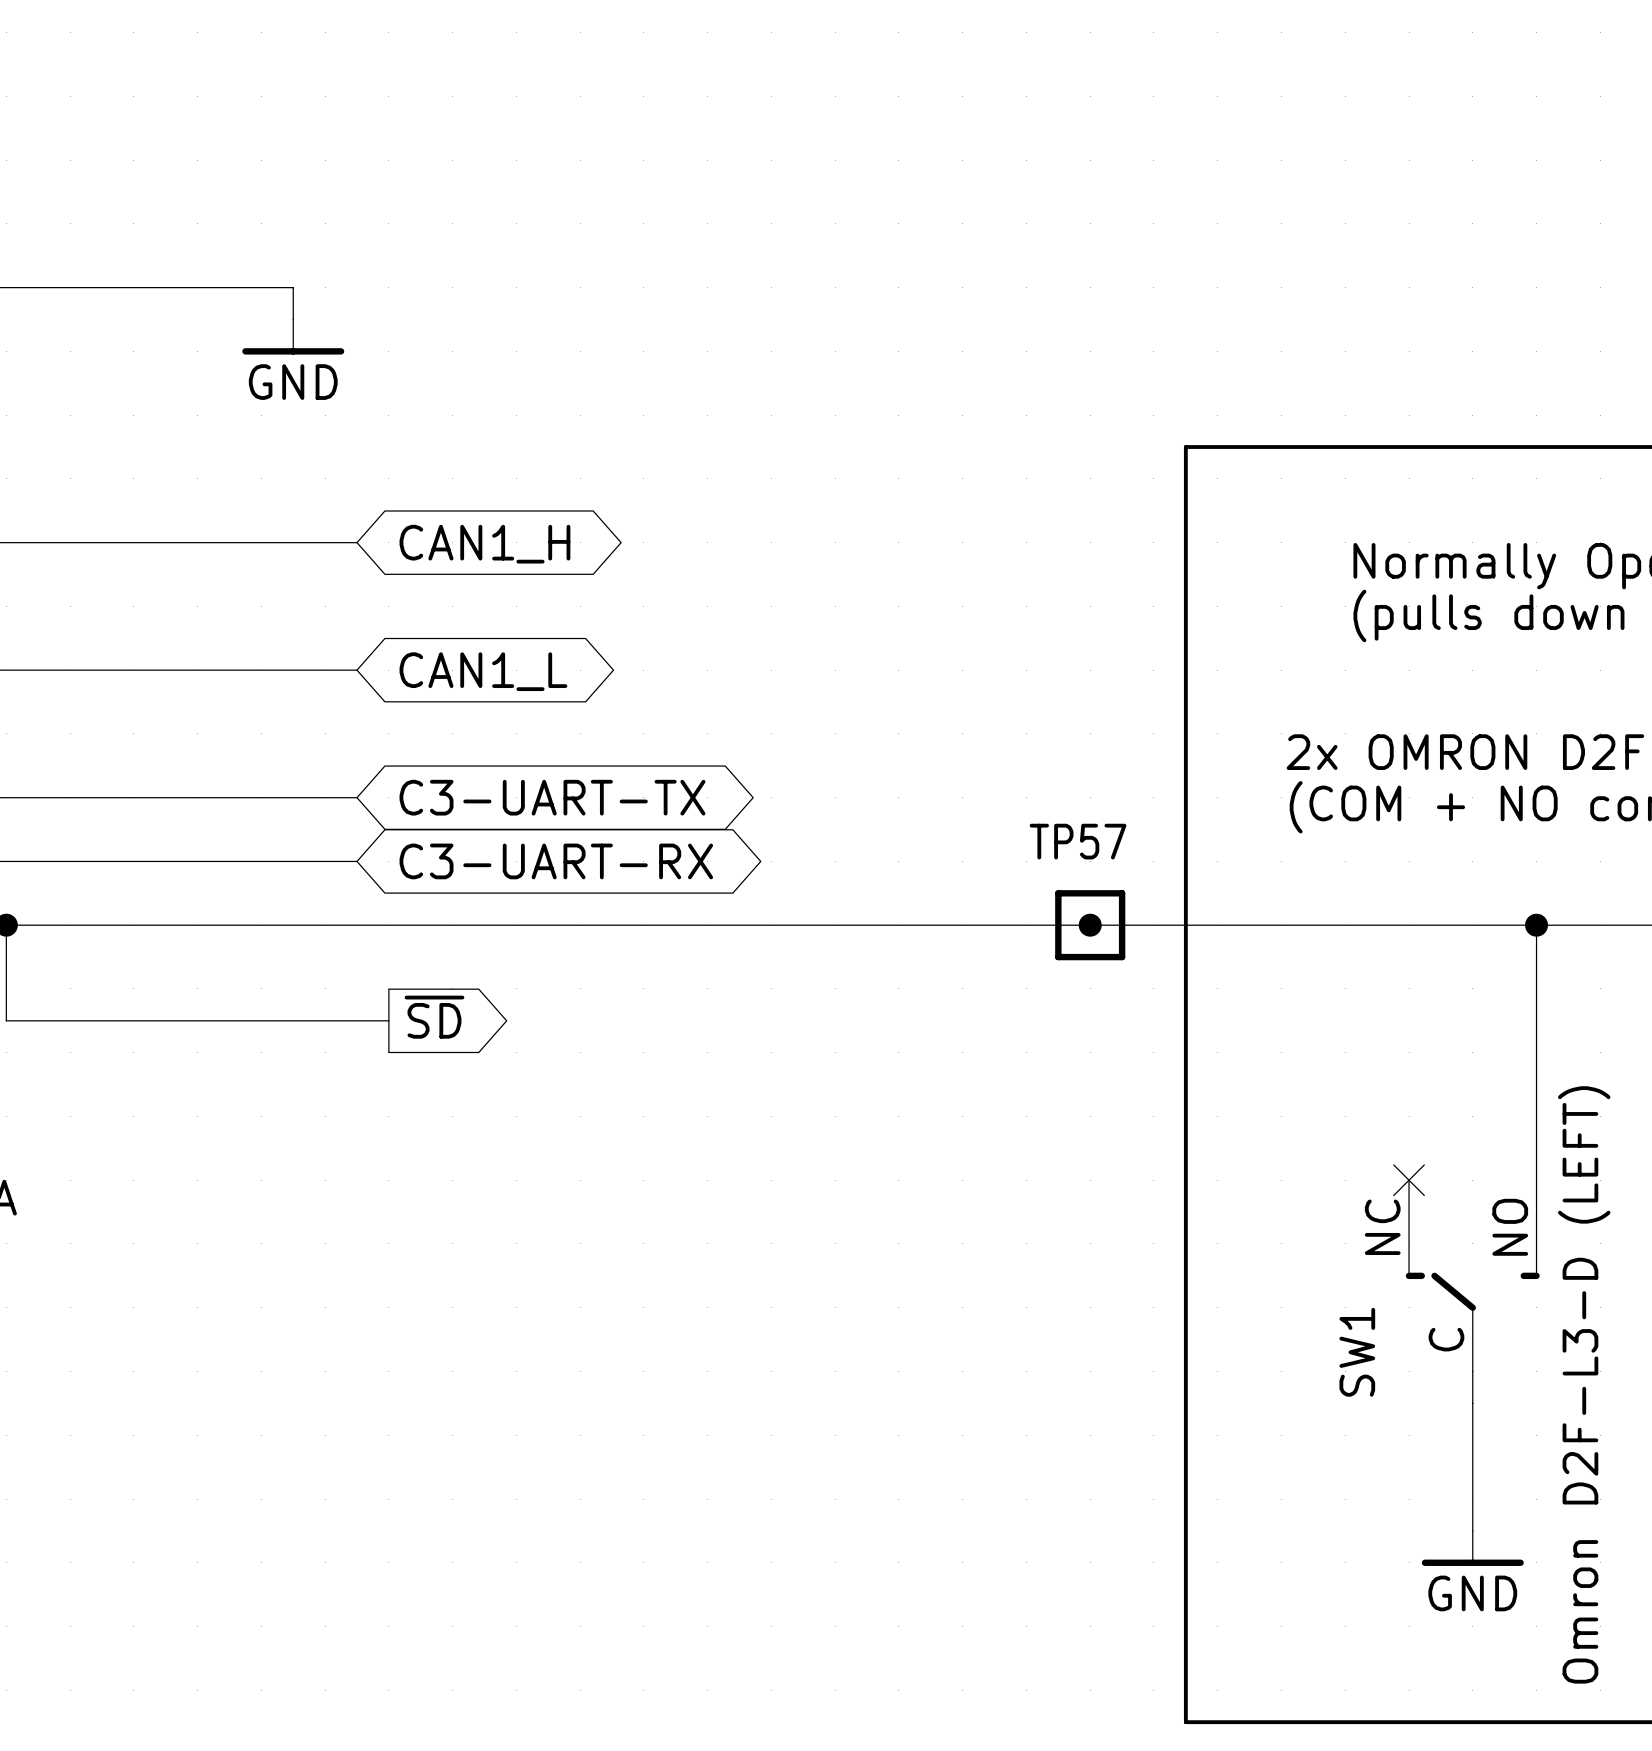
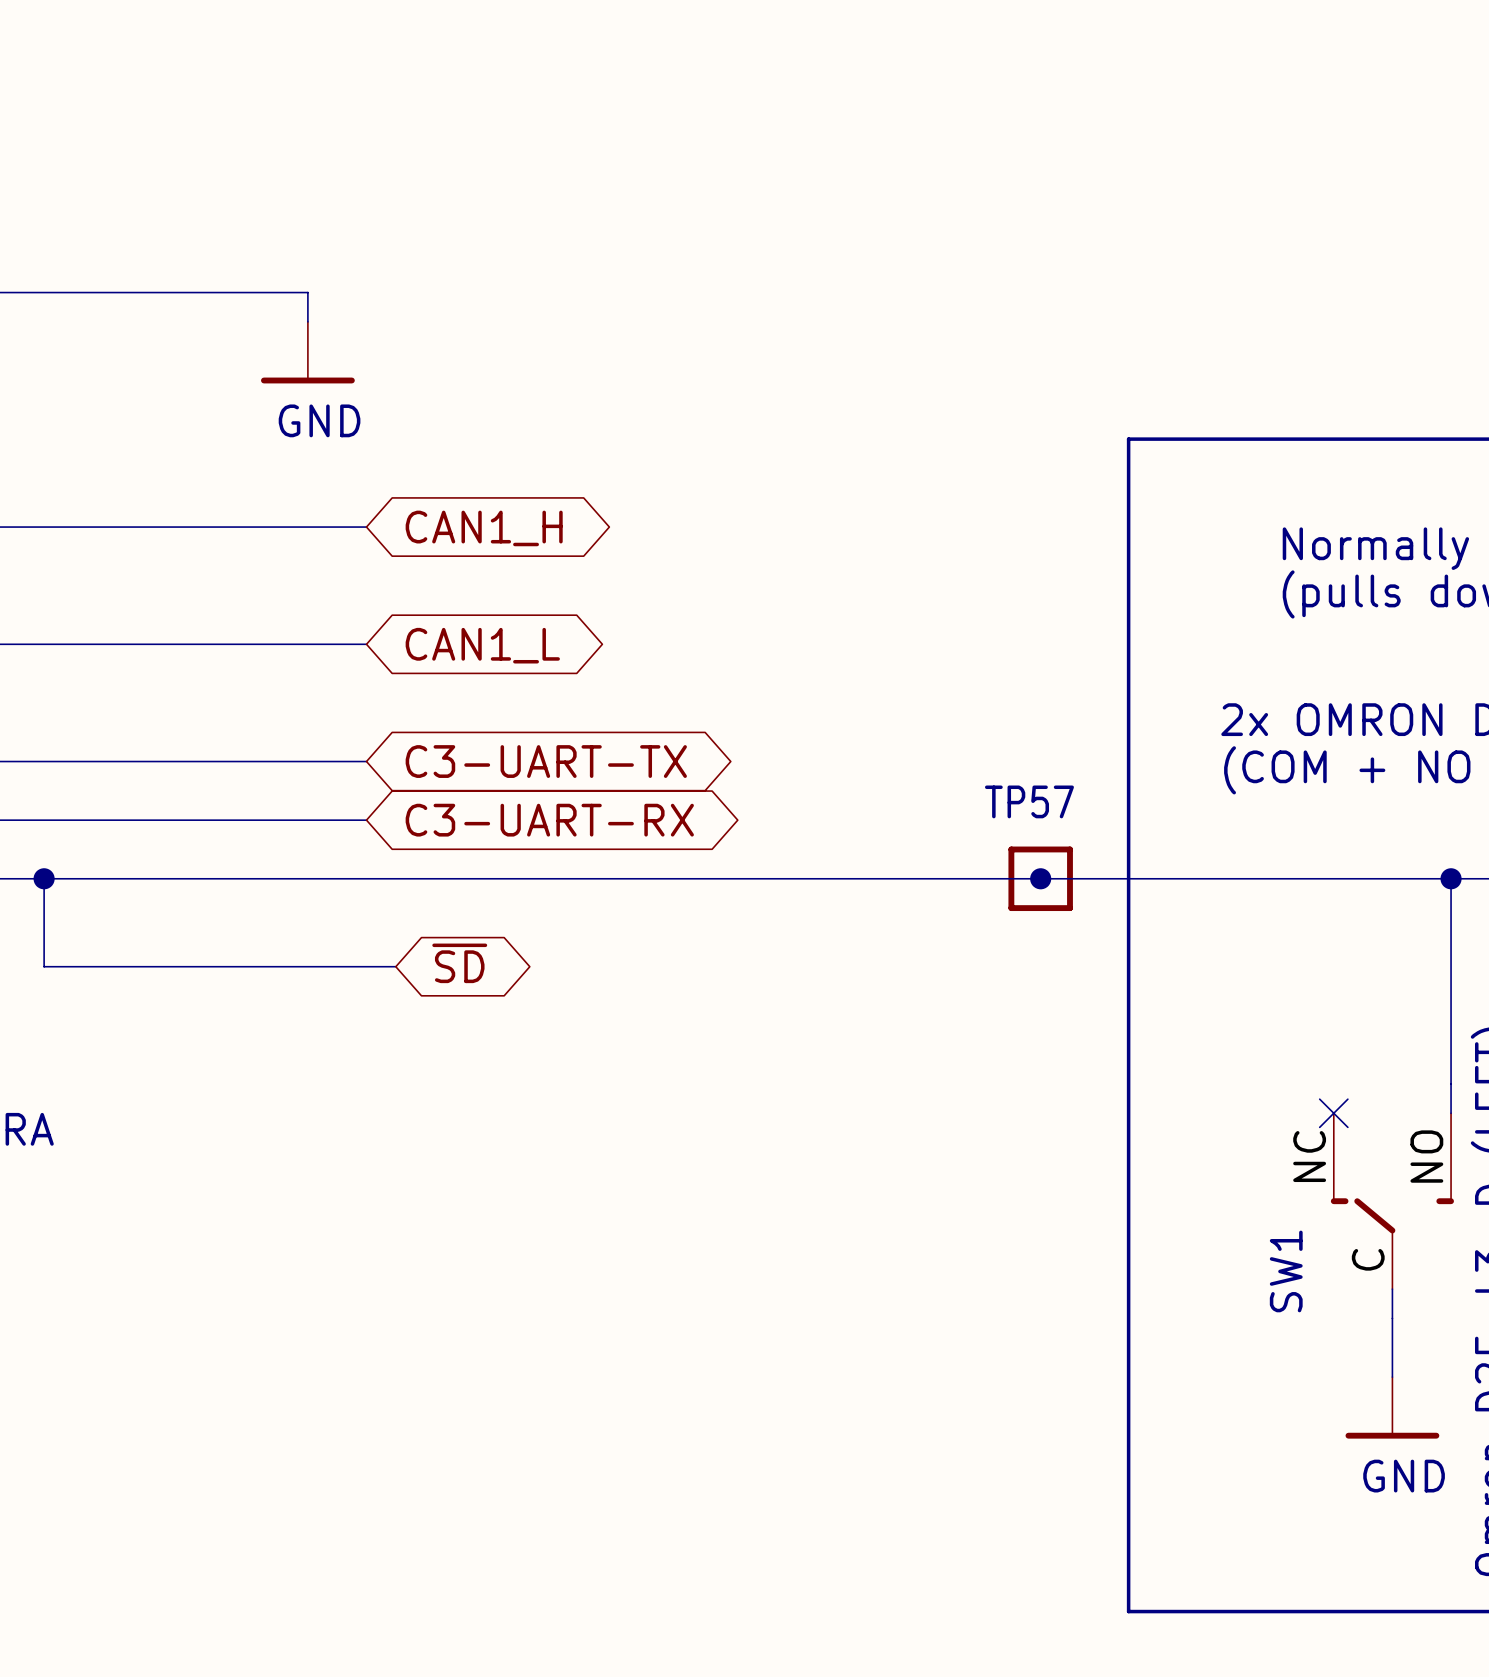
power symbol shape: [242, 319, 345, 355] -> [261, 321, 355, 384]
global label shape: output (434, 1017) -> bidirectional (459, 963)
power symbol: none -> GND (1392, 1407)
power symbol: GND (1472, 1548) -> none

